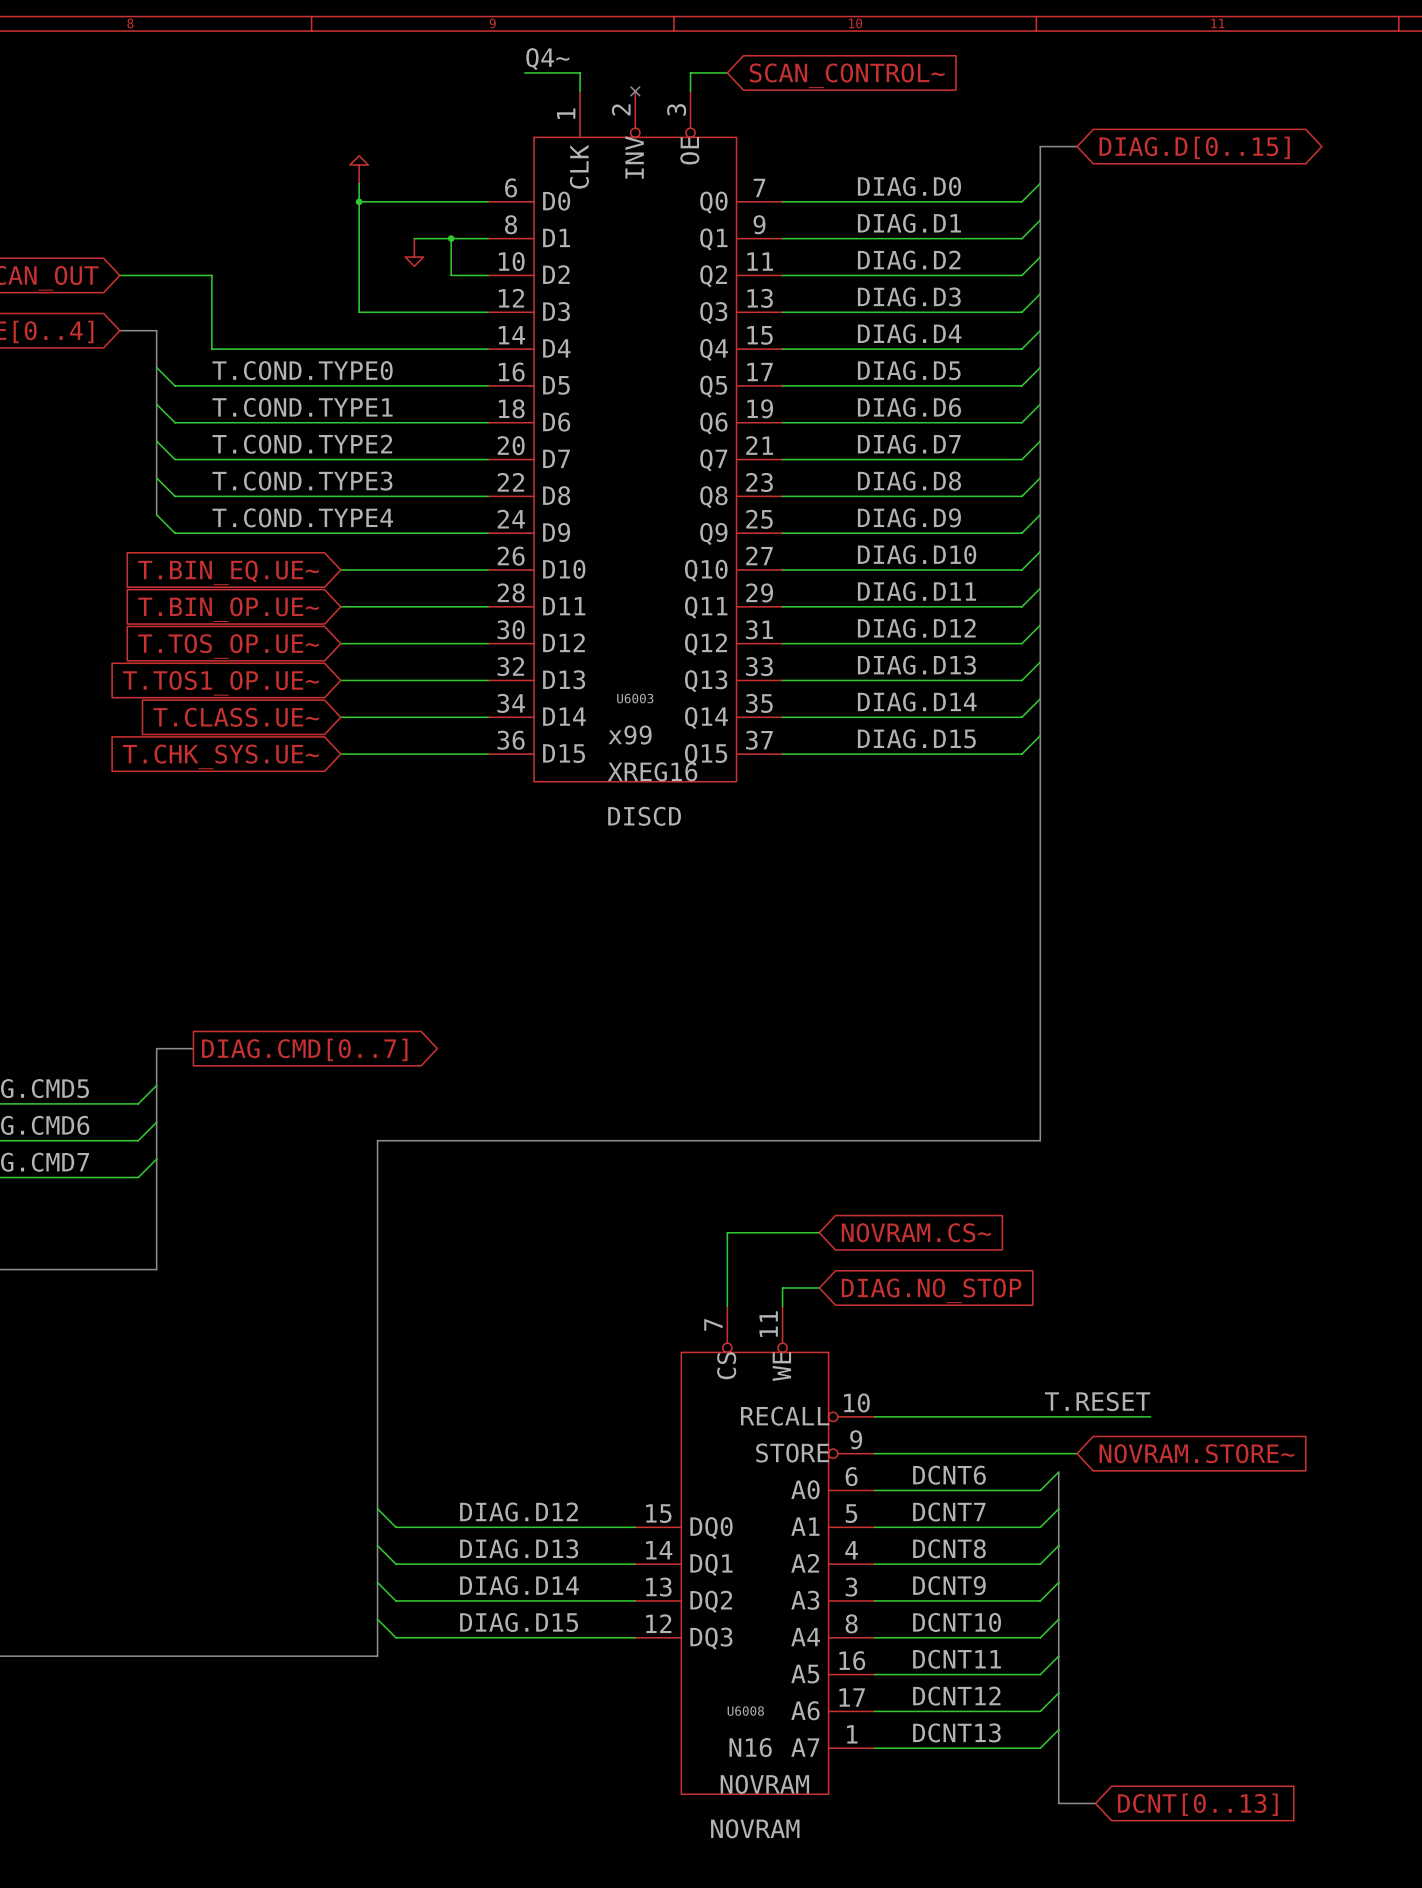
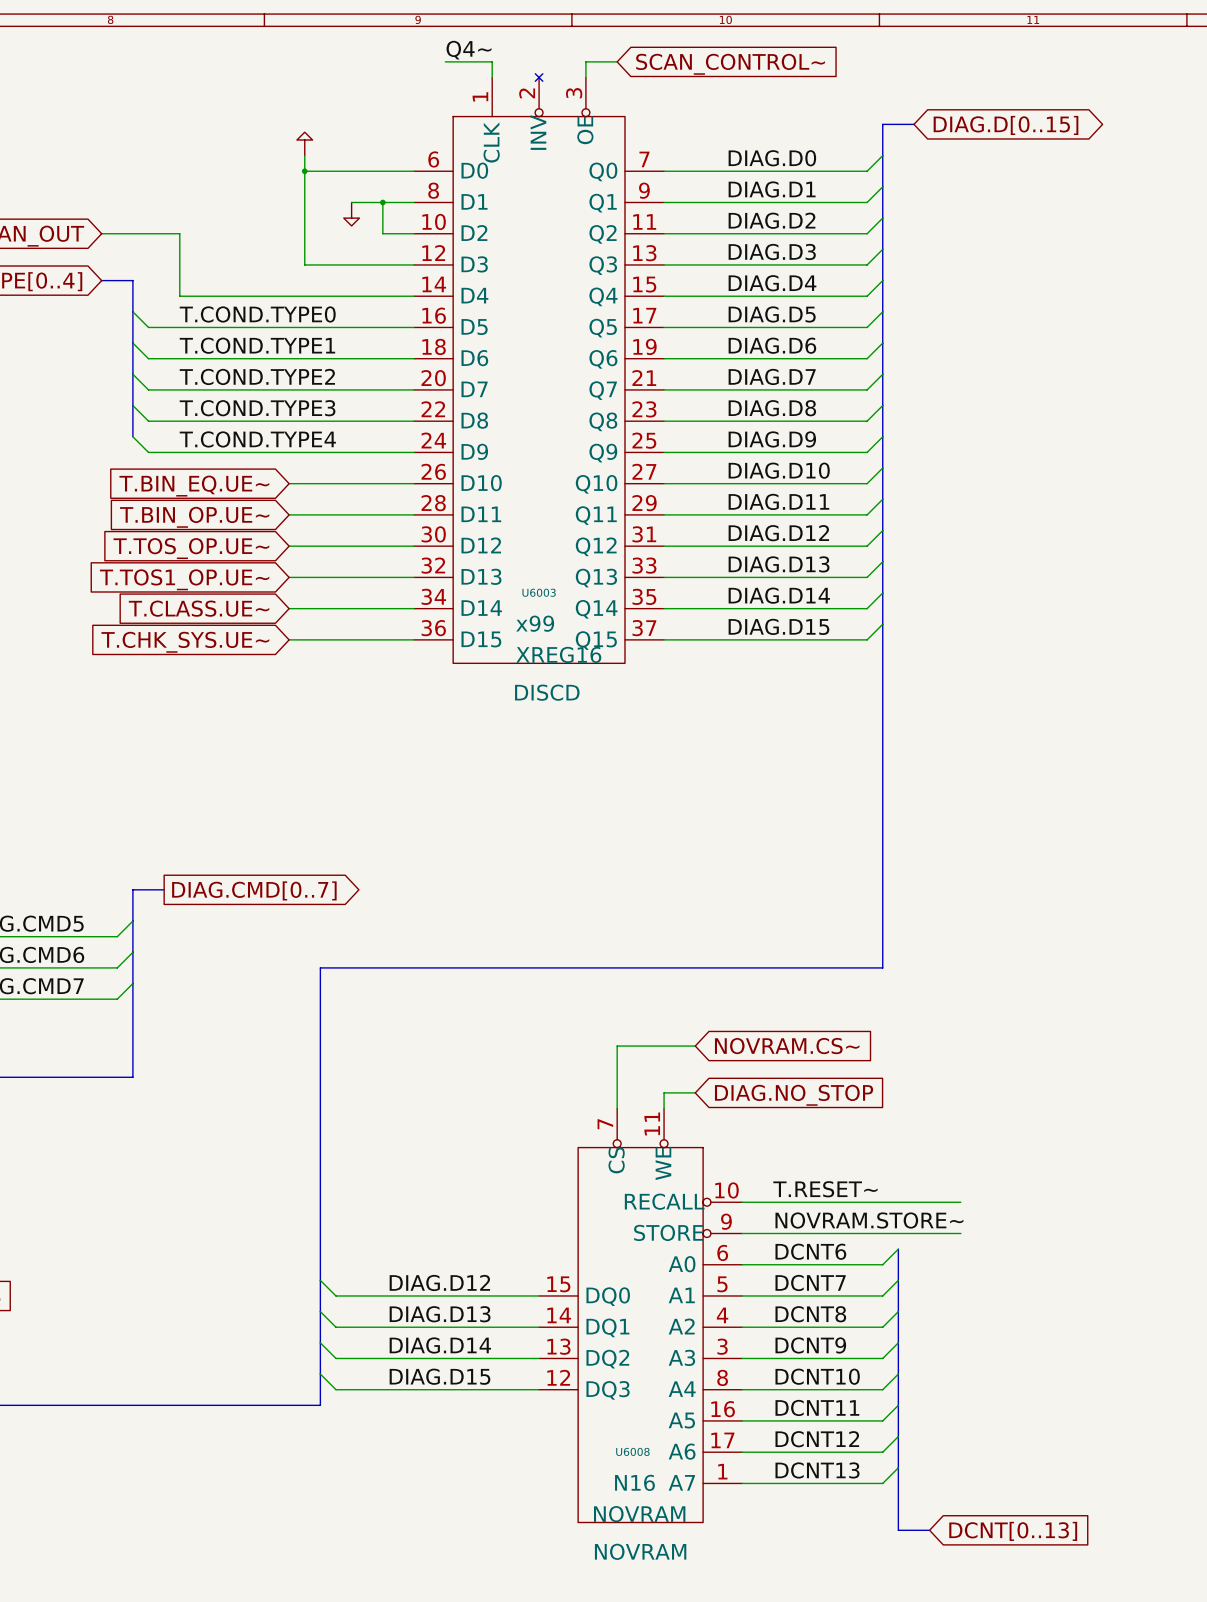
label: none -> T.RESET~ (825, 1189)
label: T.RESET (1097, 1401) -> none
wire: (1132, 1416) (1150, 1416) -> none
label: none -> NOVRAM.STORE~ (869, 1220)
wire: none -> (913, 1233) (960, 1233)
global label: NOVRAM.STORE~ (1196, 1453) -> none

